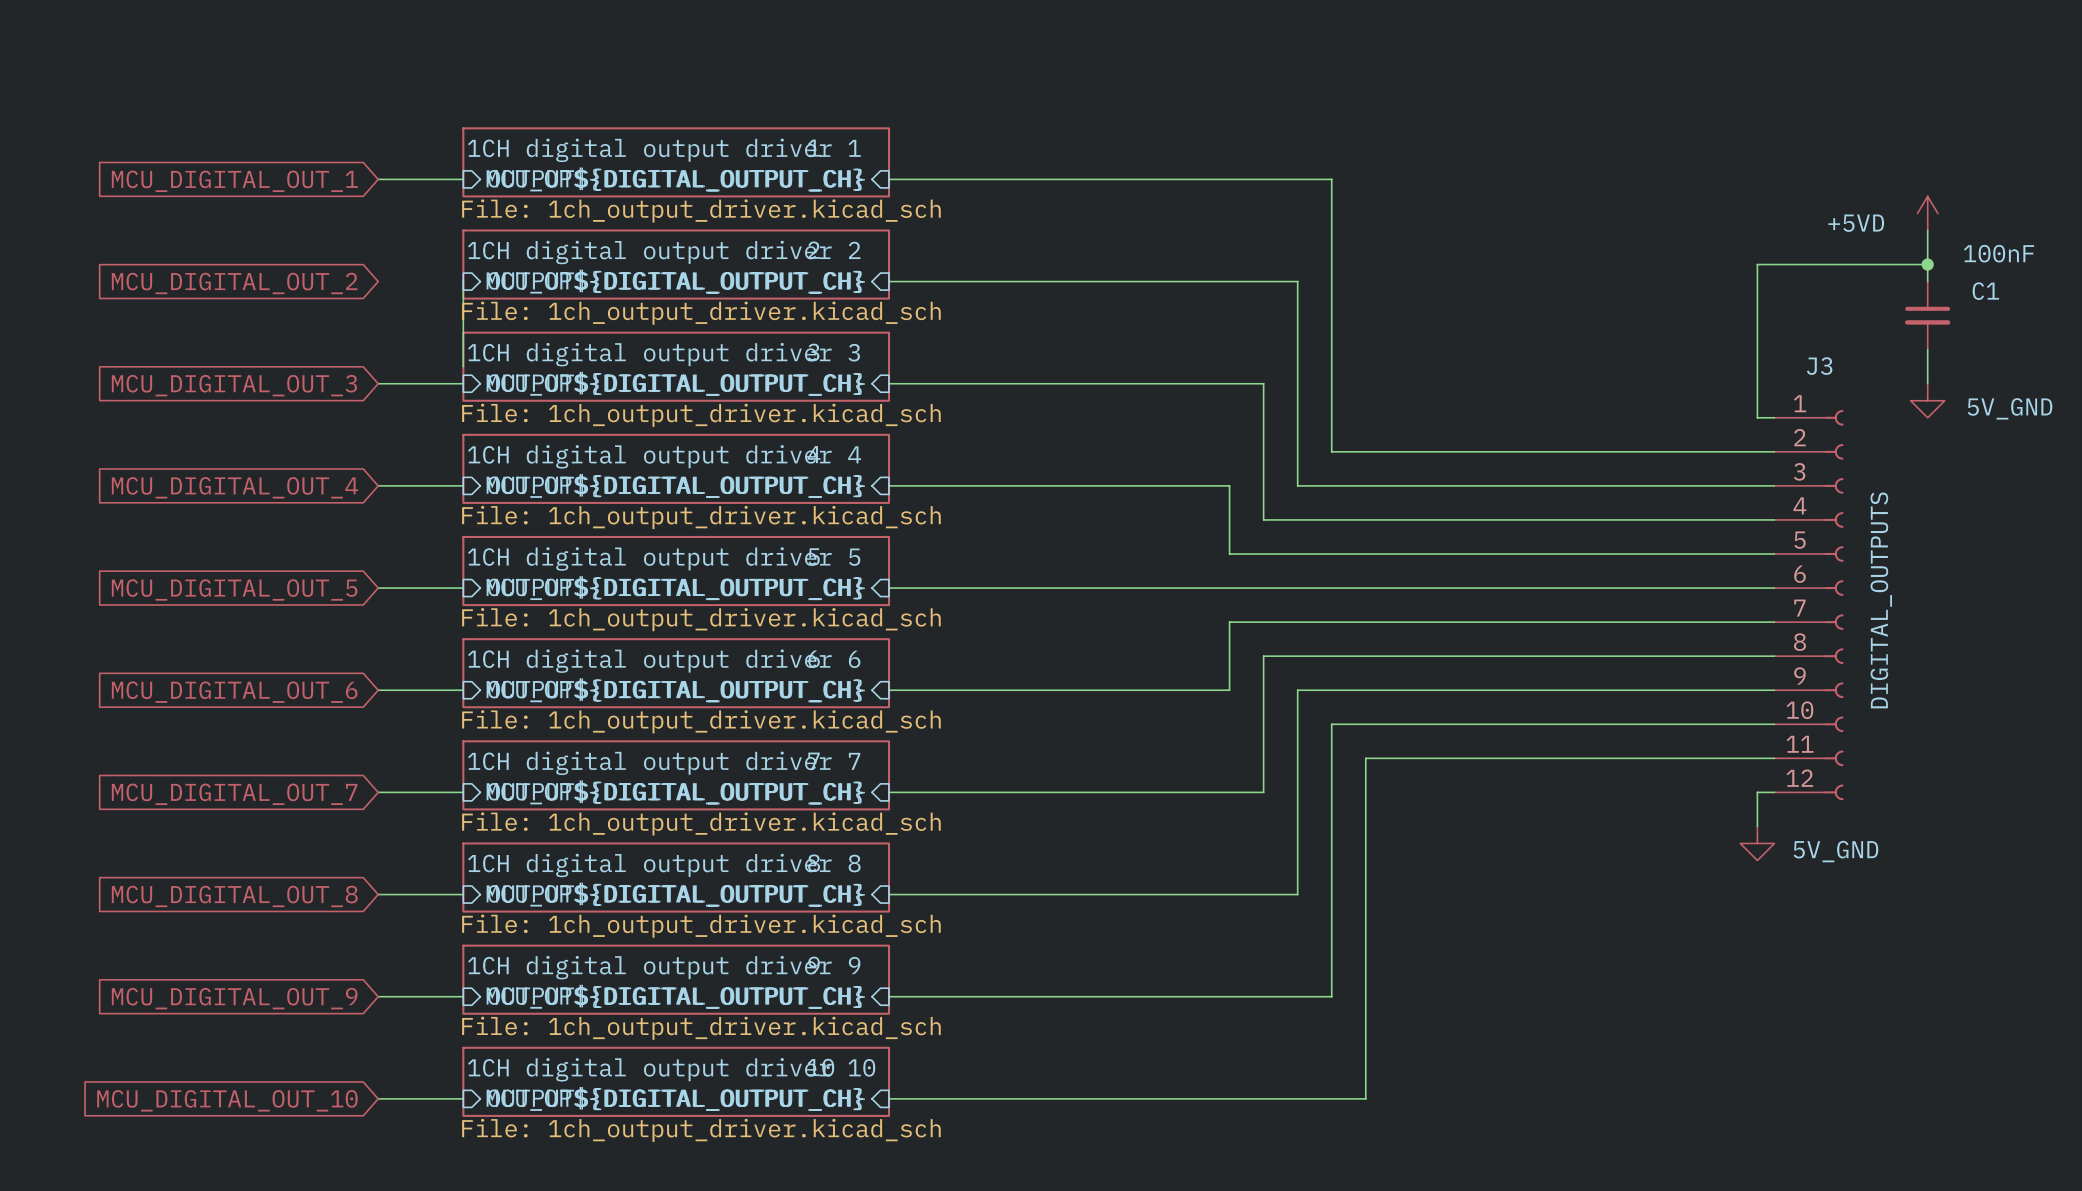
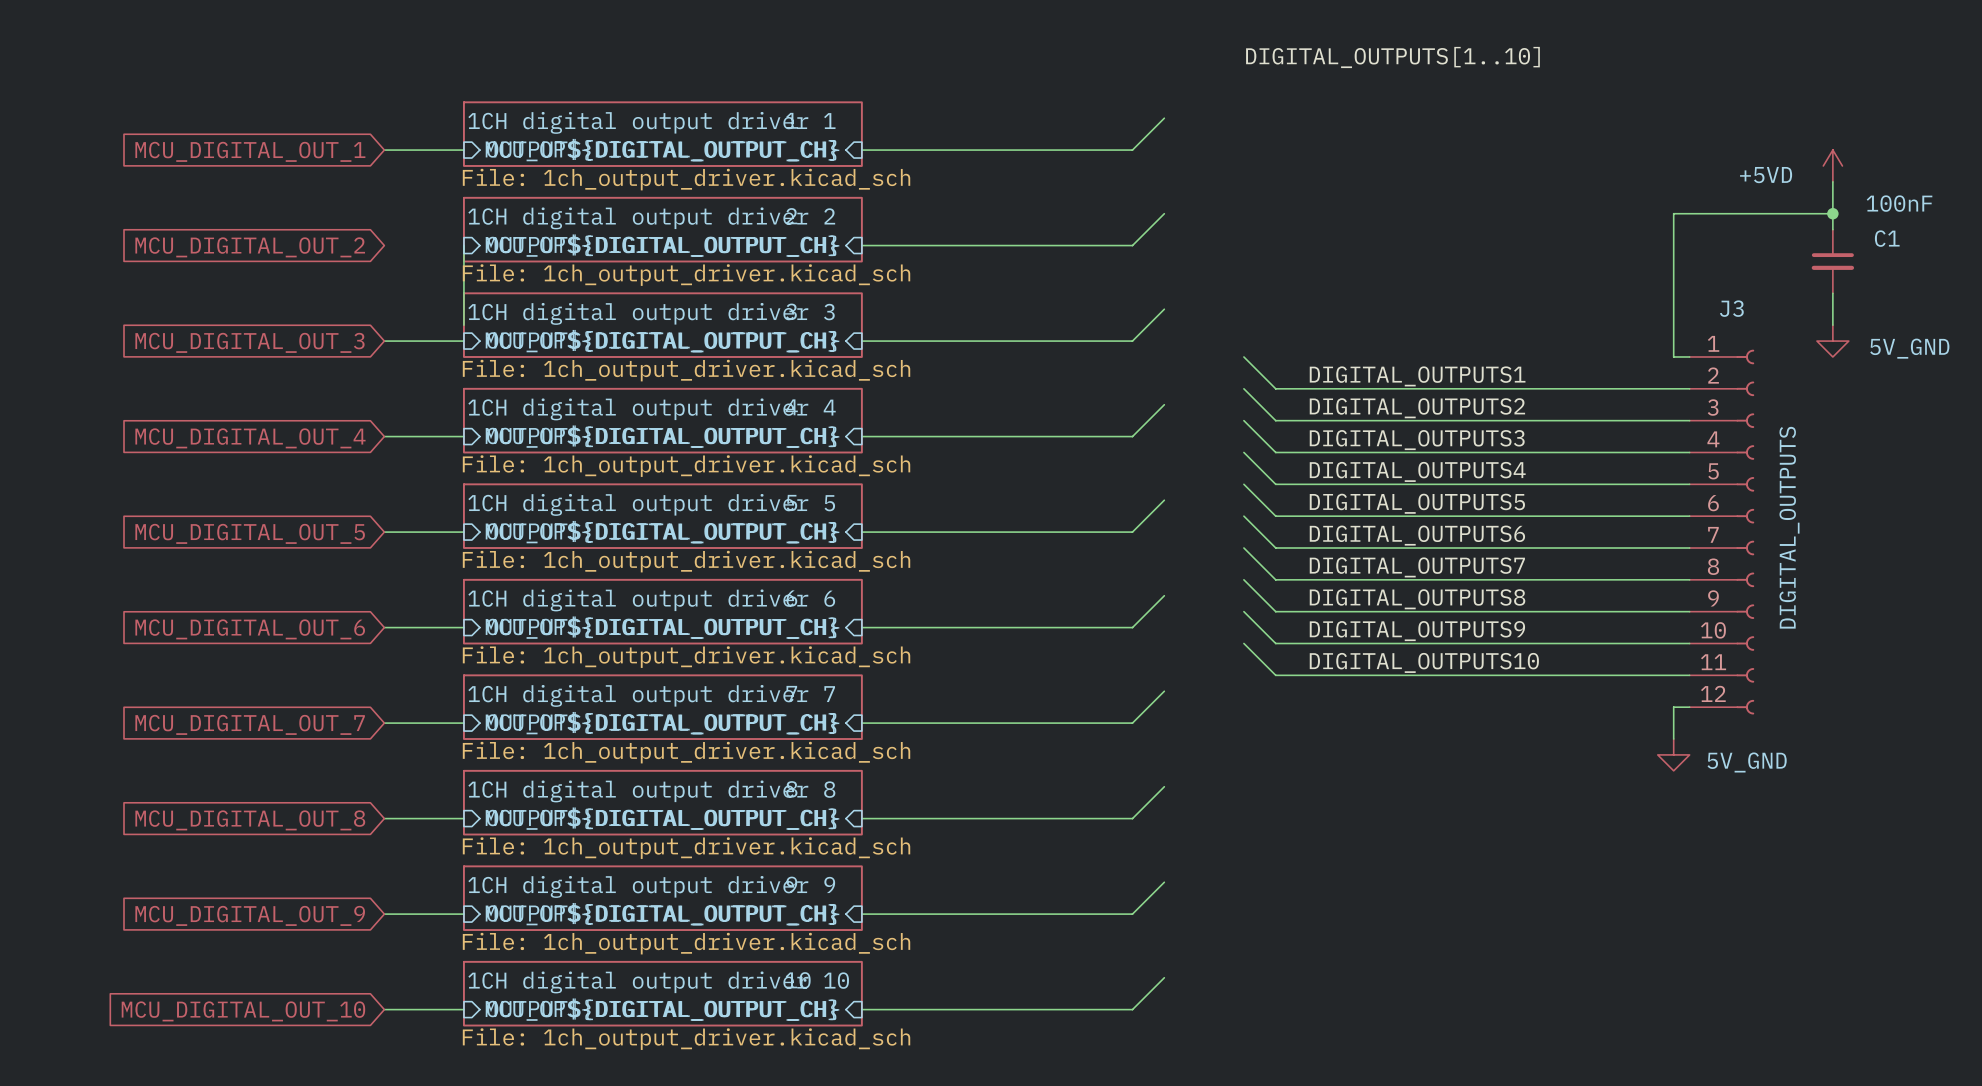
label: none -> DIGITAL_OUTPUTS[1..10] (1392, 57)
wire: (1178, 179) (1331, 179) (1331, 451) (1774, 451) -> (1132, 150) (1164, 118)
power symbol position: +5VD (1927, 213) -> +5VD (1832, 165)
wire: (1757, 264) (1927, 264) (1927, 281) -> (1673, 229) (1673, 213) (1832, 213)
junction position: (1927, 264) -> (1832, 213)
wire: (1178, 281) (1297, 281) (1297, 485) (1774, 485) -> (1132, 245) (1164, 213)
C1 position: (1927, 315) -> (1832, 261)
wire: (1178, 383) (1263, 383) (1263, 519) (1774, 519) -> (1132, 341) (1164, 309)
wire: none -> (1243, 356) (1275, 388) (1689, 388)
wire: (1757, 400) (1757, 417) (1774, 417) -> (1673, 356) (1689, 356)
power symbol position: 5V_GND (1927, 400) -> 5V_GND (1832, 341)
label: none -> DIGITAL_OUTPUTS1 (1417, 376)
wire: none -> (1243, 388) (1275, 420) (1689, 420)
label: none -> DIGITAL_OUTPUTS2 (1417, 408)
wire: none -> (1243, 420) (1275, 452) (1689, 452)
wire: (1178, 485) (1229, 485) (1229, 554) (1774, 554) -> (1132, 436) (1164, 404)
label: none -> DIGITAL_OUTPUTS3 (1417, 440)
wire: none -> (1243, 452) (1275, 484) (1689, 484)
label: none -> DIGITAL_OUTPUTS4 (1417, 471)
wire: none -> (1243, 484) (1275, 516) (1689, 516)
label: none -> DIGITAL_OUTPUTS5 (1417, 503)
wire: none -> (1243, 516) (1275, 548) (1689, 548)
wire: (1178, 588) (1774, 588) -> (1132, 532) (1164, 500)
label: none -> DIGITAL_OUTPUTS6 (1417, 535)
wire: none -> (1243, 548) (1275, 579) (1689, 579)
J3 position: (1809, 605) -> (1721, 532)
wire: (1774, 622) (1229, 622) (1229, 690) (1178, 690) -> (1164, 595) (1132, 627)
label: none -> DIGITAL_OUTPUTS7 (1417, 567)
wire: none -> (1243, 579) (1275, 611) (1689, 611)
wire: (1774, 656) (1263, 656) (1263, 792) (1178, 792) -> (1164, 691) (1132, 723)
label: none -> DIGITAL_OUTPUTS8 (1417, 599)
wire: none -> (1243, 611) (1275, 643) (1689, 643)
wire: (1774, 690) (1297, 690) (1297, 894) (1178, 894) -> (1164, 786) (1132, 818)
label: none -> DIGITAL_OUTPUTS9 (1417, 631)
wire: none -> (1243, 643) (1275, 675) (1689, 675)
wire: (1774, 724) (1331, 724) (1331, 996) (1178, 996) -> (1164, 882) (1132, 914)
label: none -> DIGITAL_OUTPUTS10 (1424, 662)
wire: (1774, 758) (1365, 758) (1365, 1098) (1178, 1098) -> (1164, 977) (1132, 1009)
wire: (1757, 792) (1774, 792) -> (1673, 723) (1673, 707) (1689, 707)
power symbol position: 5V_GND (1757, 843) -> 5V_GND (1673, 754)

